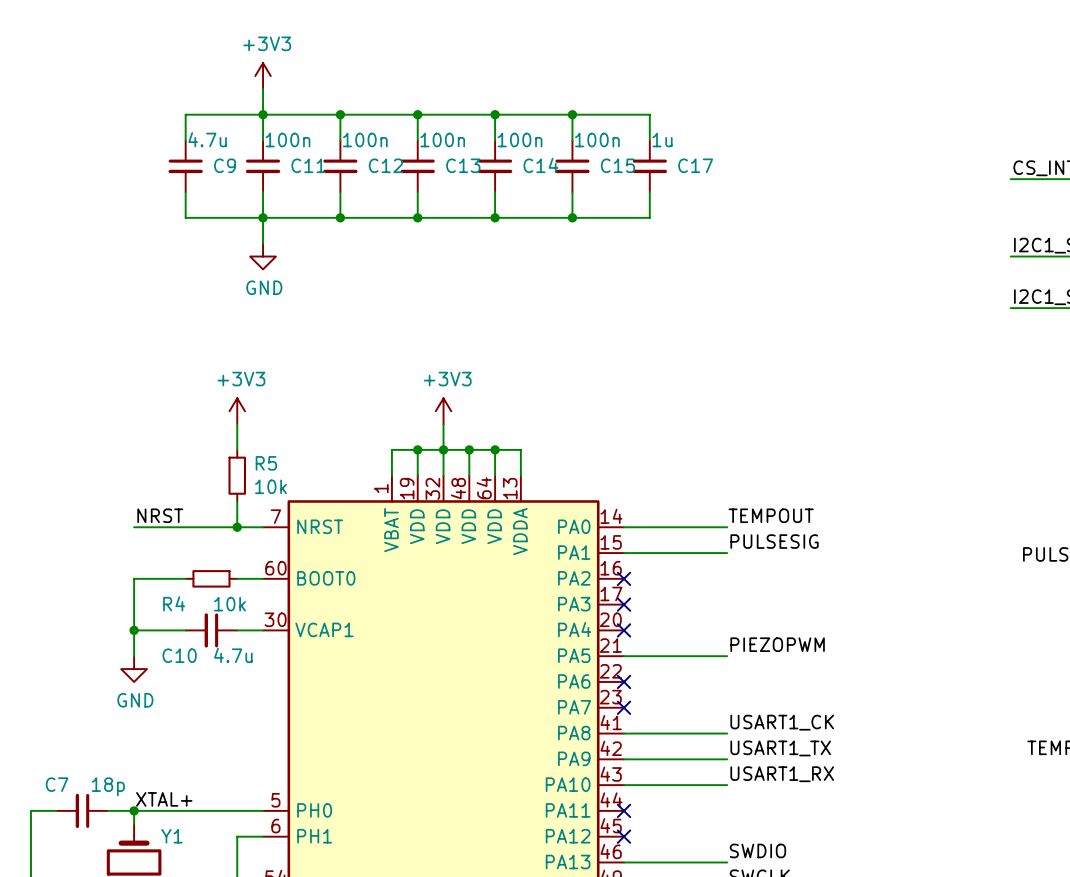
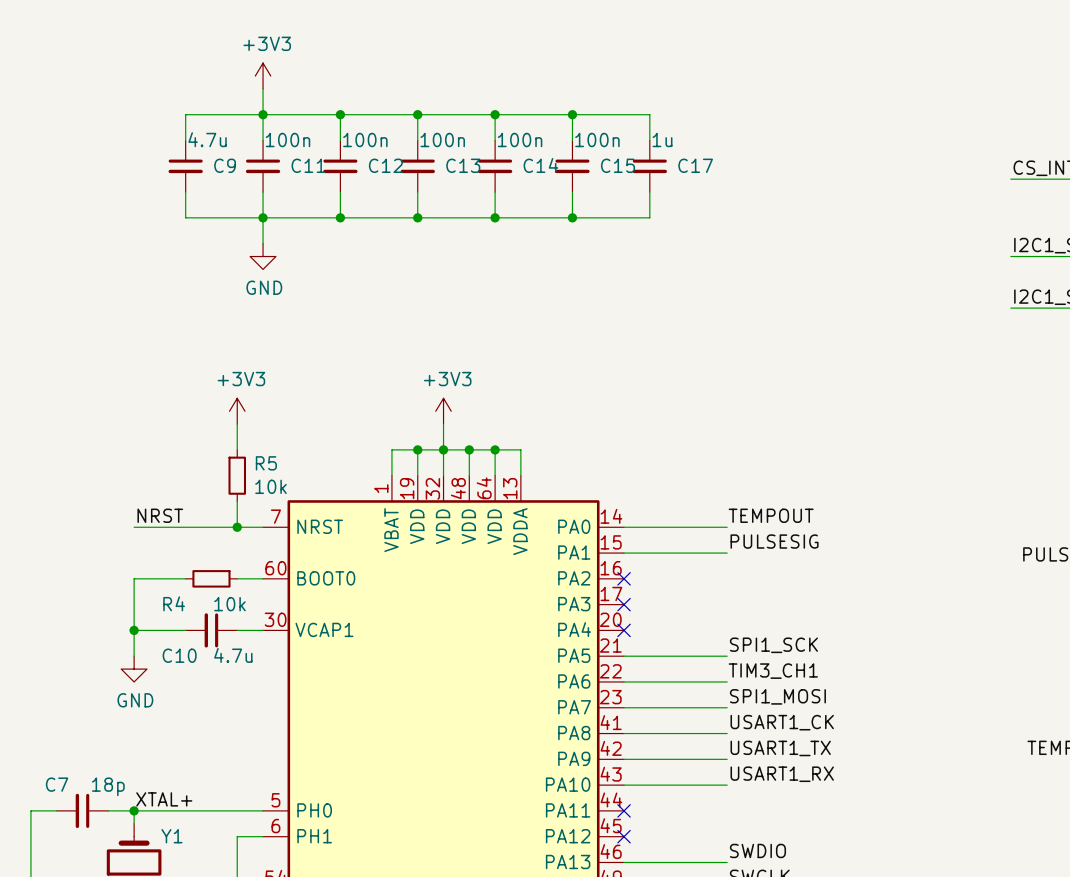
label: PIEZOPWM (777, 644) -> SPI1_SCK (773, 645)
label: none -> TIM3_CH1 (773, 671)
wire: none -> (624, 681) (727, 681)
no-connect mark: (624, 681) -> none
label: none -> SPI1_MOSI (777, 696)
wire: none -> (624, 707) (727, 707)
no-connect mark: (624, 707) -> none

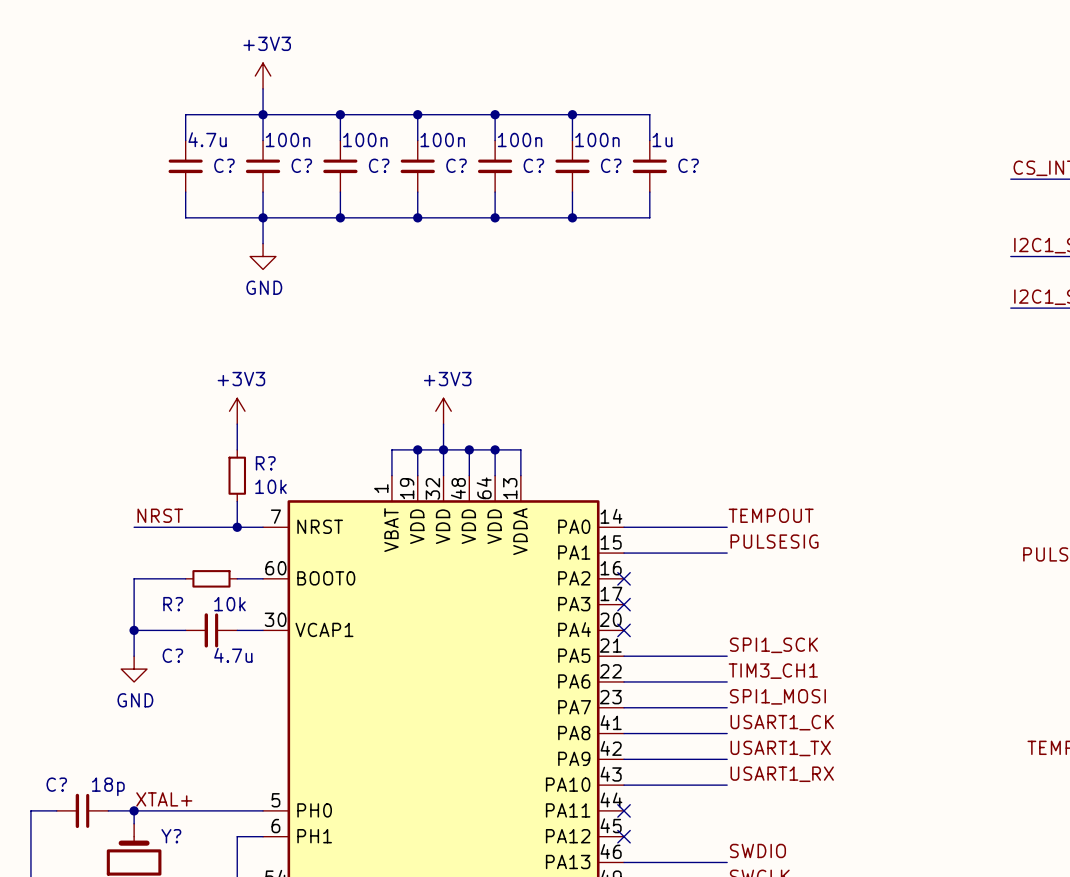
C9 name: C9 (225, 165) -> C? (224, 165)
C11 name: C11 (308, 165) -> C? (301, 165)
C12 name: C12 (385, 165) -> C? (379, 165)
C13 name: C13 (463, 165) -> C? (456, 165)
C14 name: C14 (540, 165) -> C? (533, 165)
C15 name: C15 (617, 165) -> C? (611, 165)
C17 name: C17 (695, 165) -> C? (688, 165)
R5 name: R5 (266, 463) -> R? (265, 463)
R4 name: R4 (174, 603) -> R? (173, 604)
C10 name: C10 (179, 655) -> C? (172, 655)
C7 name: C7 (57, 784) -> C? (56, 784)
Y1 name: Y1 (171, 836) -> Y? (171, 836)

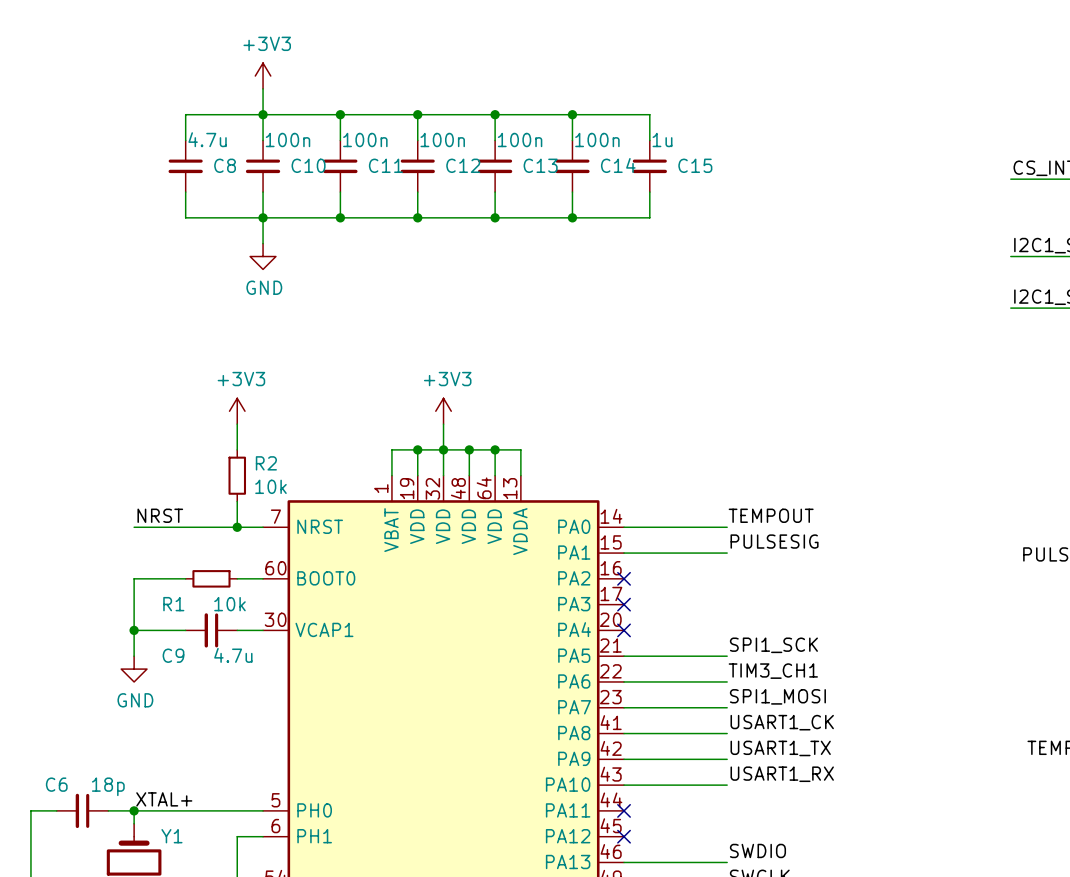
C? name: C? (224, 165) -> C8 (225, 165)
C? name: C? (301, 165) -> C10 (308, 165)
C? name: C? (379, 165) -> C11 (385, 165)
C? name: C? (456, 165) -> C12 (463, 165)
C? name: C? (533, 165) -> C13 (540, 165)
C? name: C? (611, 165) -> C14 (618, 165)
C? name: C? (688, 165) -> C15 (695, 165)
R? name: R? (265, 463) -> R2 (266, 463)
R? name: R? (173, 604) -> R1 (173, 604)
C? name: C? (172, 655) -> C9 (173, 655)
C? name: C? (56, 784) -> C6 (56, 784)
Y? name: Y? (171, 836) -> Y1 (171, 836)

